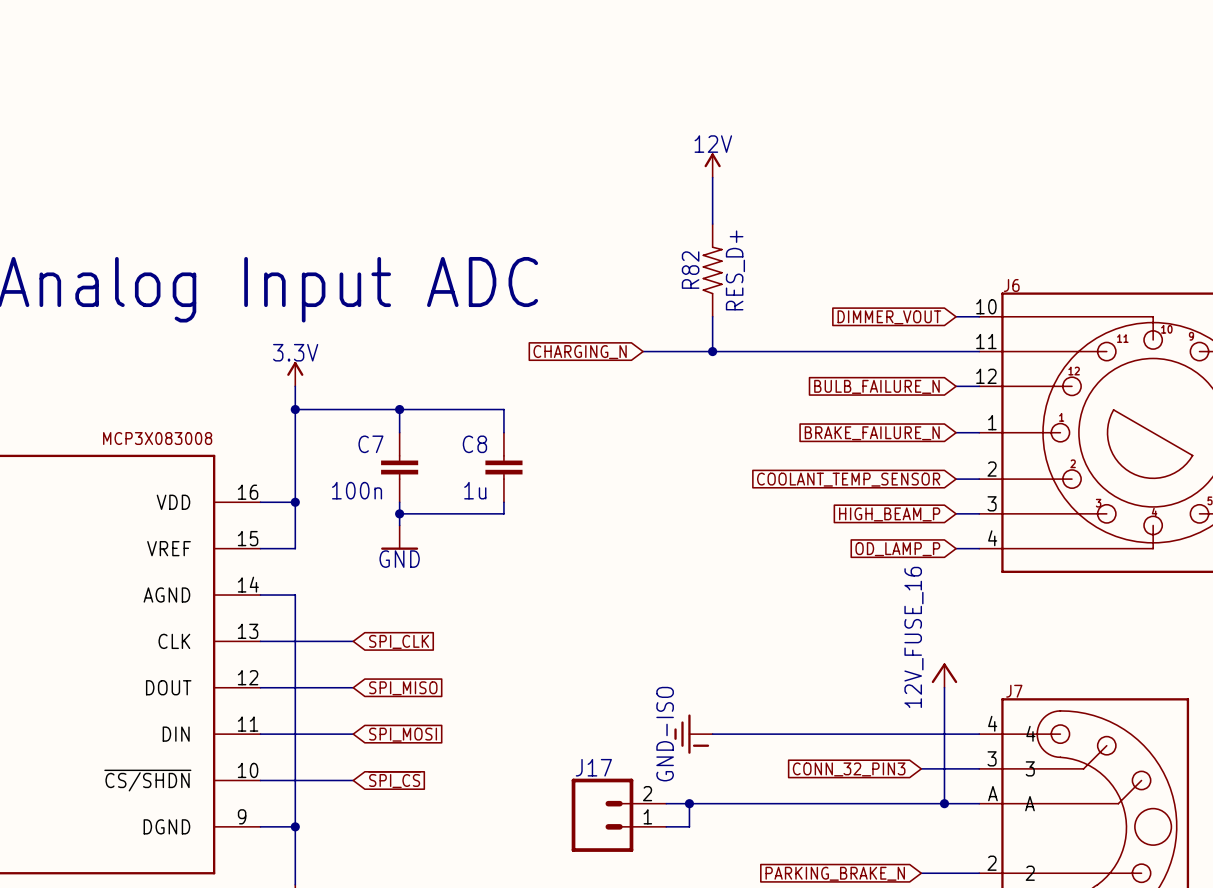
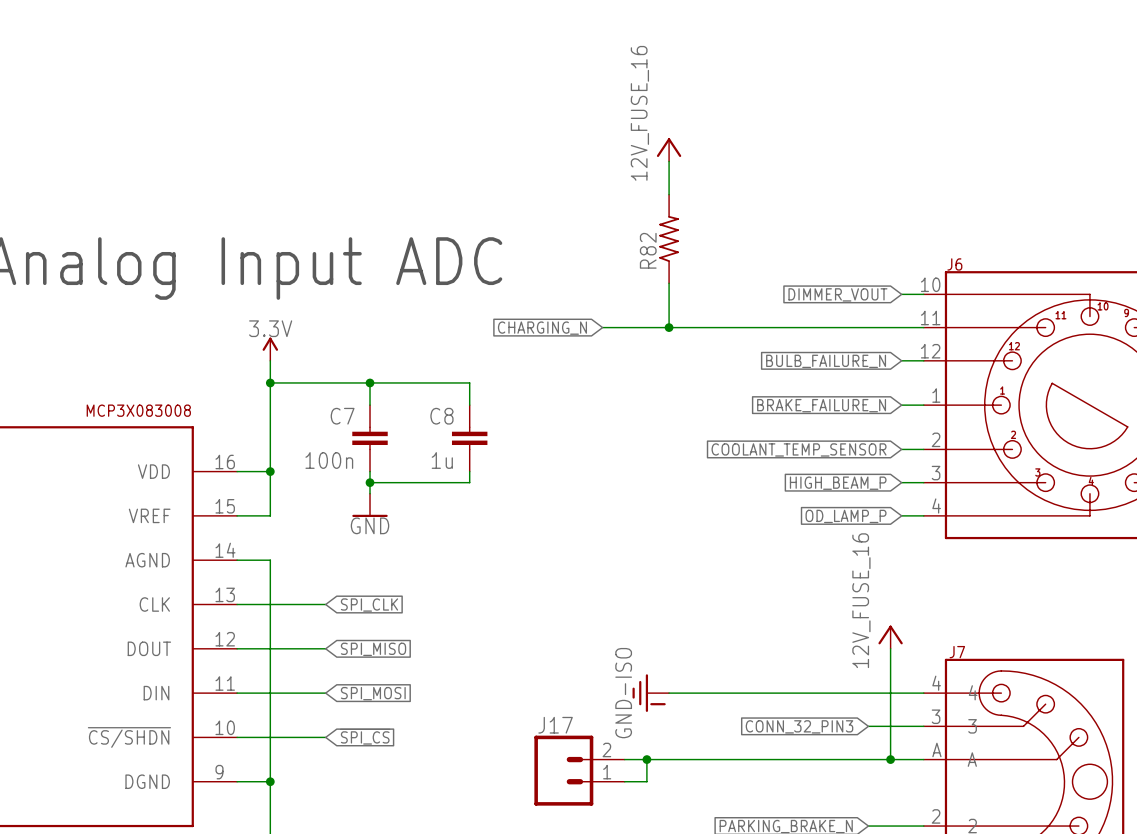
power symbol: 12V (712, 165) -> 12V_FUSE_16 (669, 149)
R82 symbol: [702, 224, 723, 317] -> [659, 194, 679, 284]
R82 value: RES_D+ (735, 270) -> none

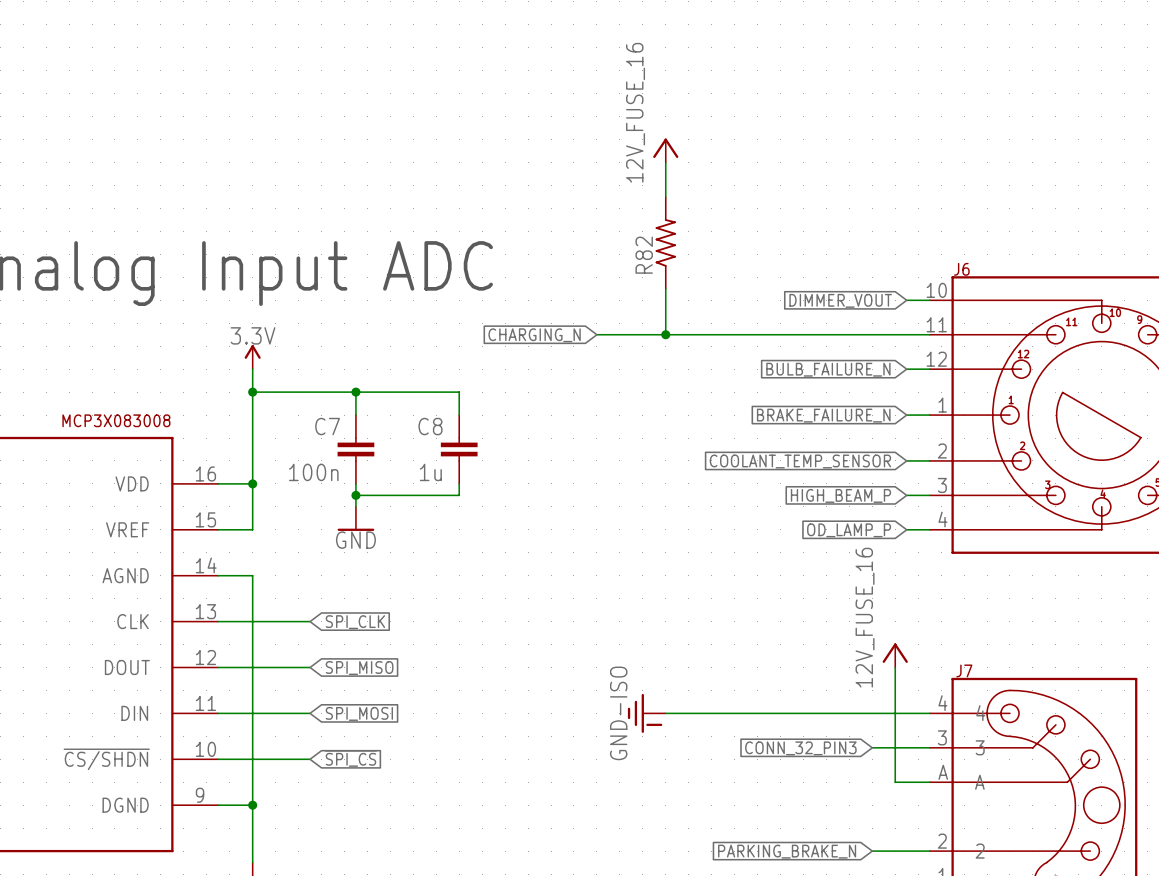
wire: (624, 759) (890, 759) -> none
wire: (646, 759) (646, 781) (624, 781) -> none
junction: (646, 759) -> none
junction: (890, 759) -> none
J17: (579, 770) -> none

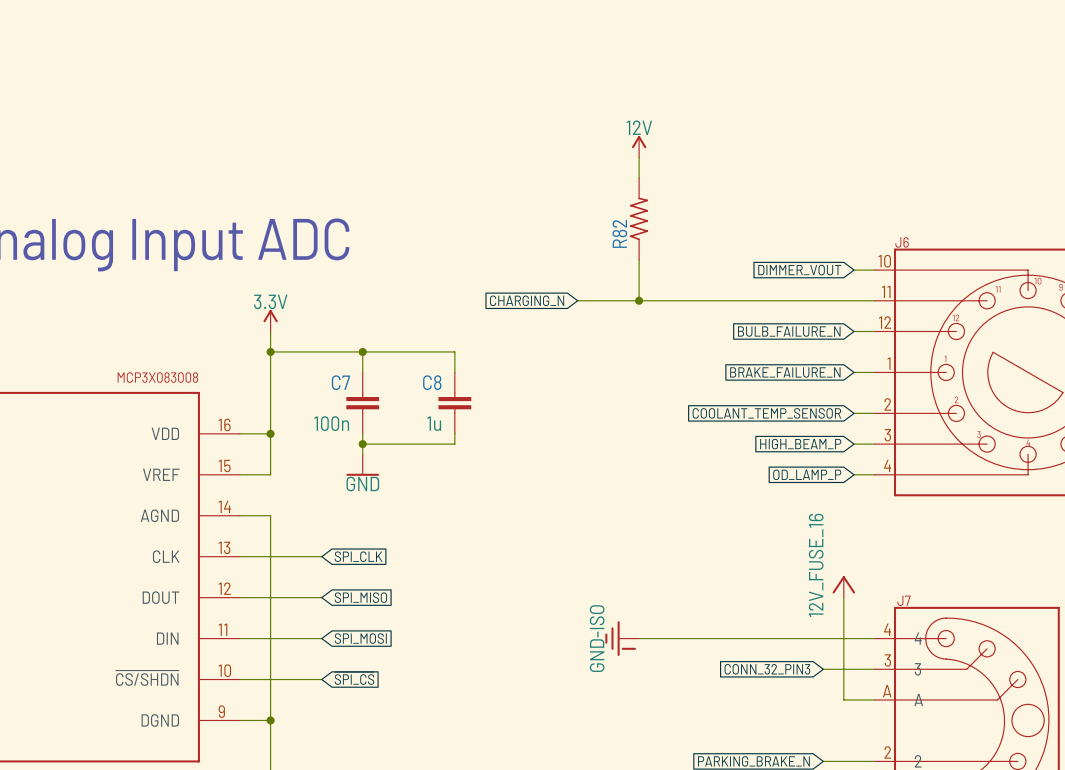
power symbol: 12V_FUSE_16 (665, 150) -> none
power symbol: none -> 12V (639, 146)

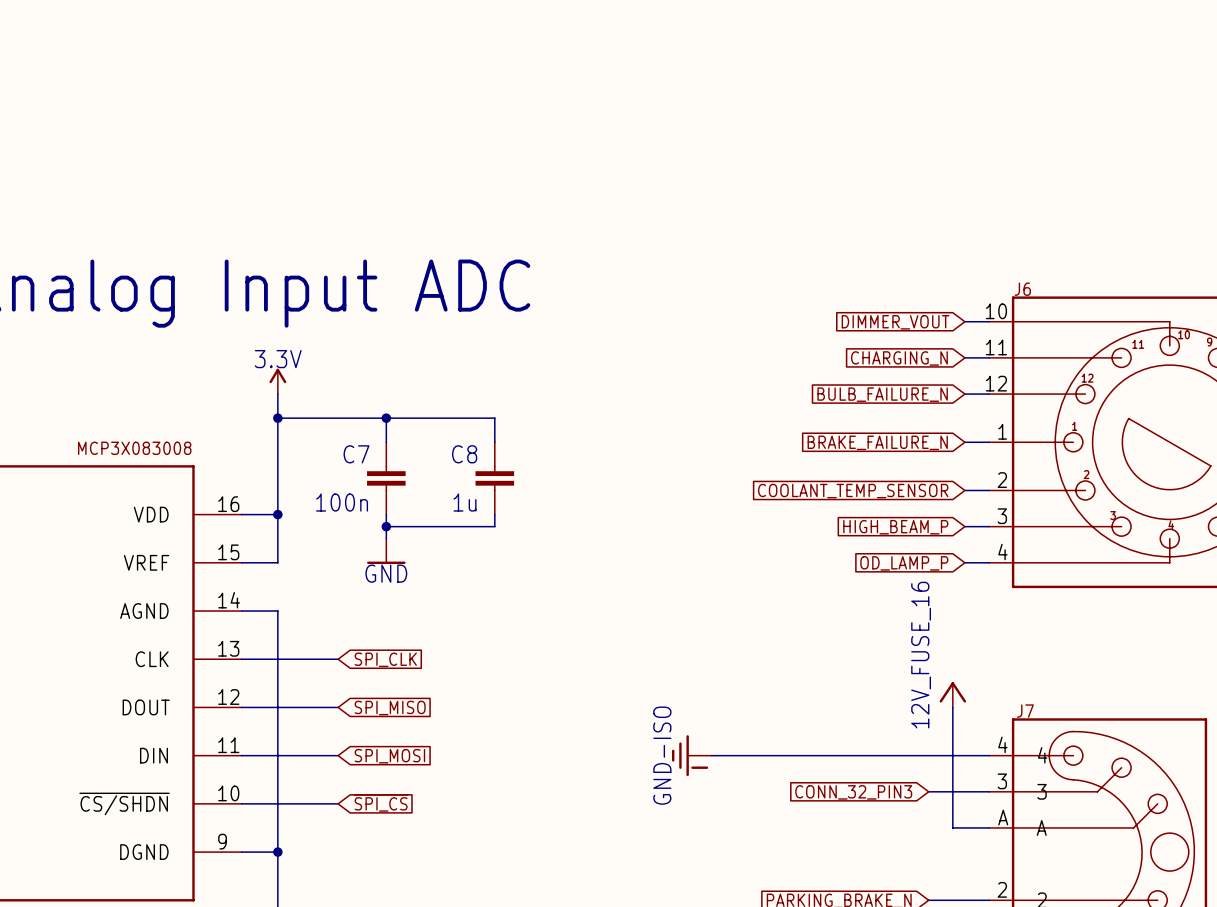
power symbol: 12V (639, 146) -> none
wire: (639, 157) (639, 177) -> none
R82: (639, 218) -> none
wire: (639, 259) (639, 300) -> none
global label: CHARGING_N (527, 300) -> none
wire: (577, 300) (854, 300) -> none
junction: (639, 300) -> none
global label: none -> CHARGING_N (899, 358)

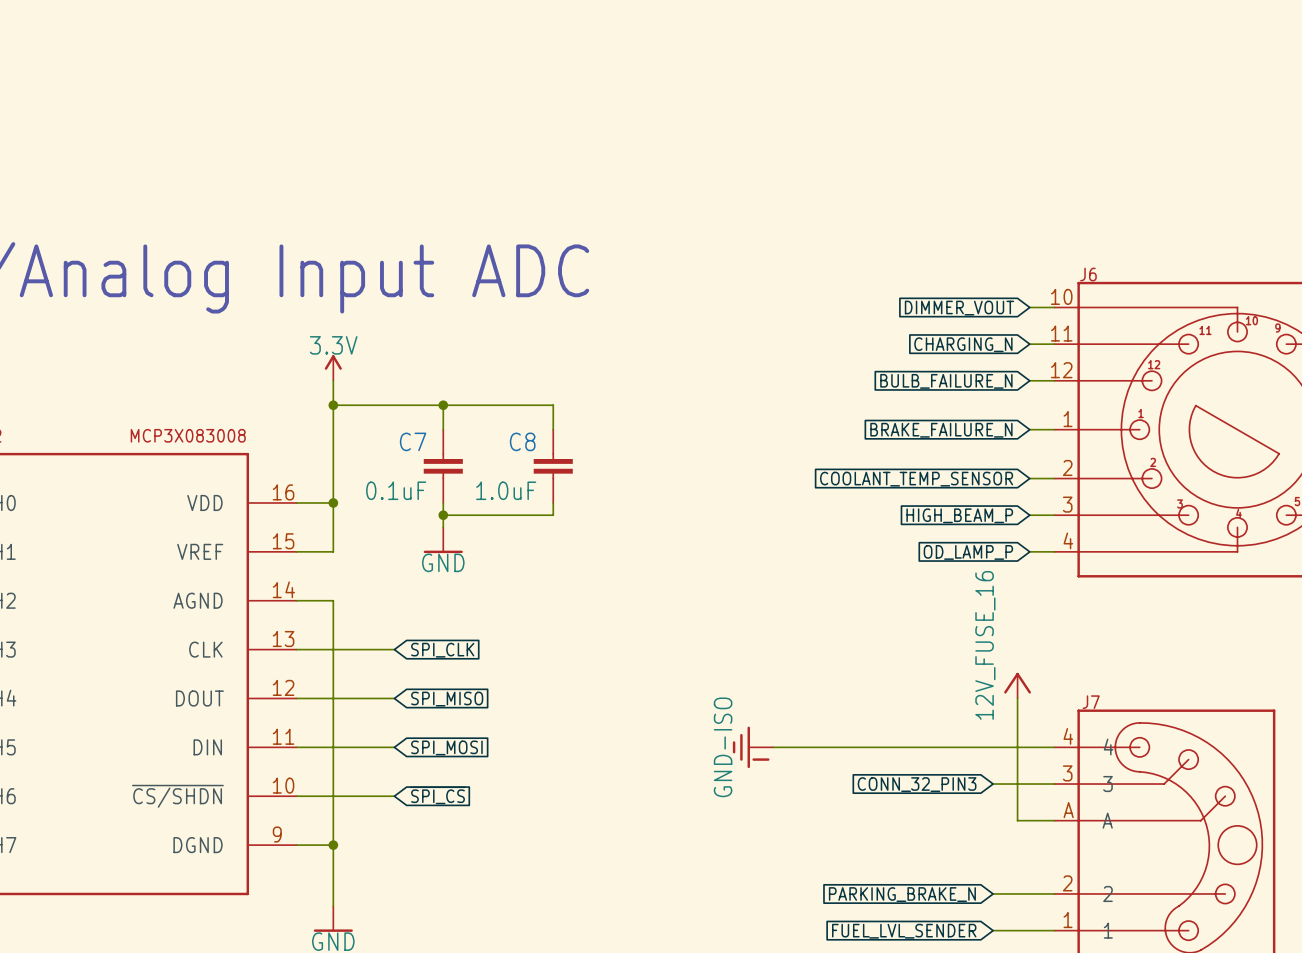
C7 value: 100n (342, 502) -> 0.1uF (396, 490)
C8 value: 1u (464, 502) -> 1.0uF (506, 490)

